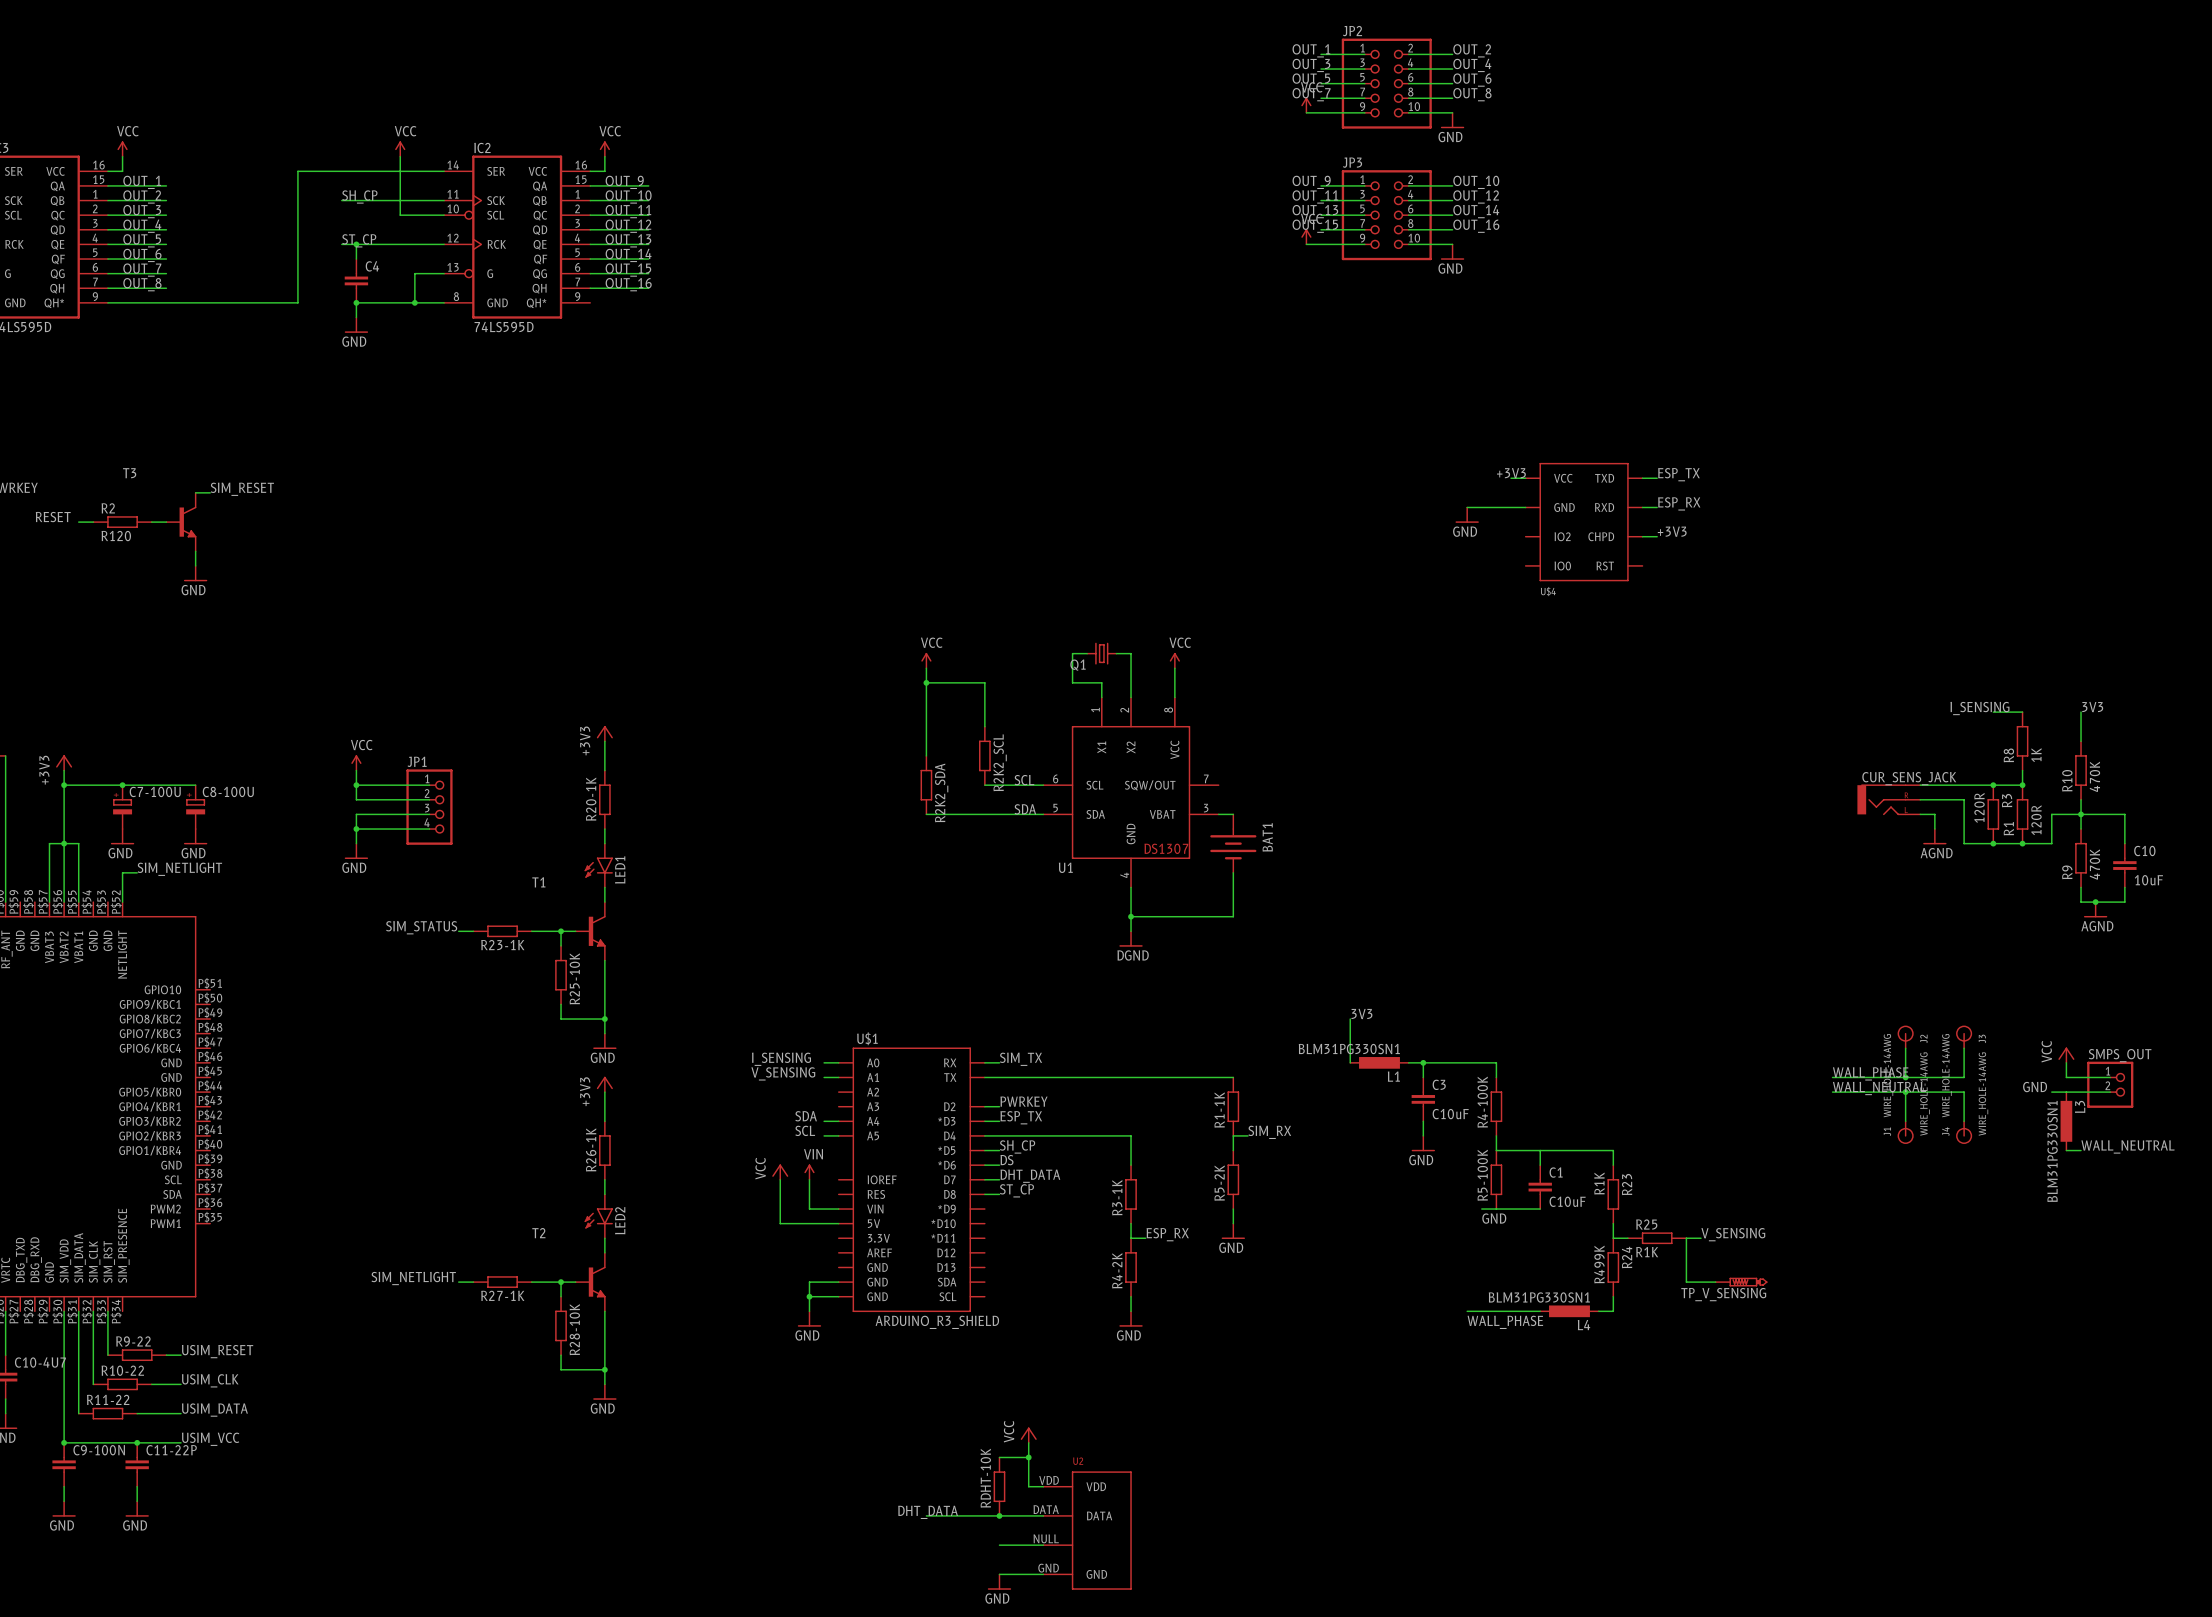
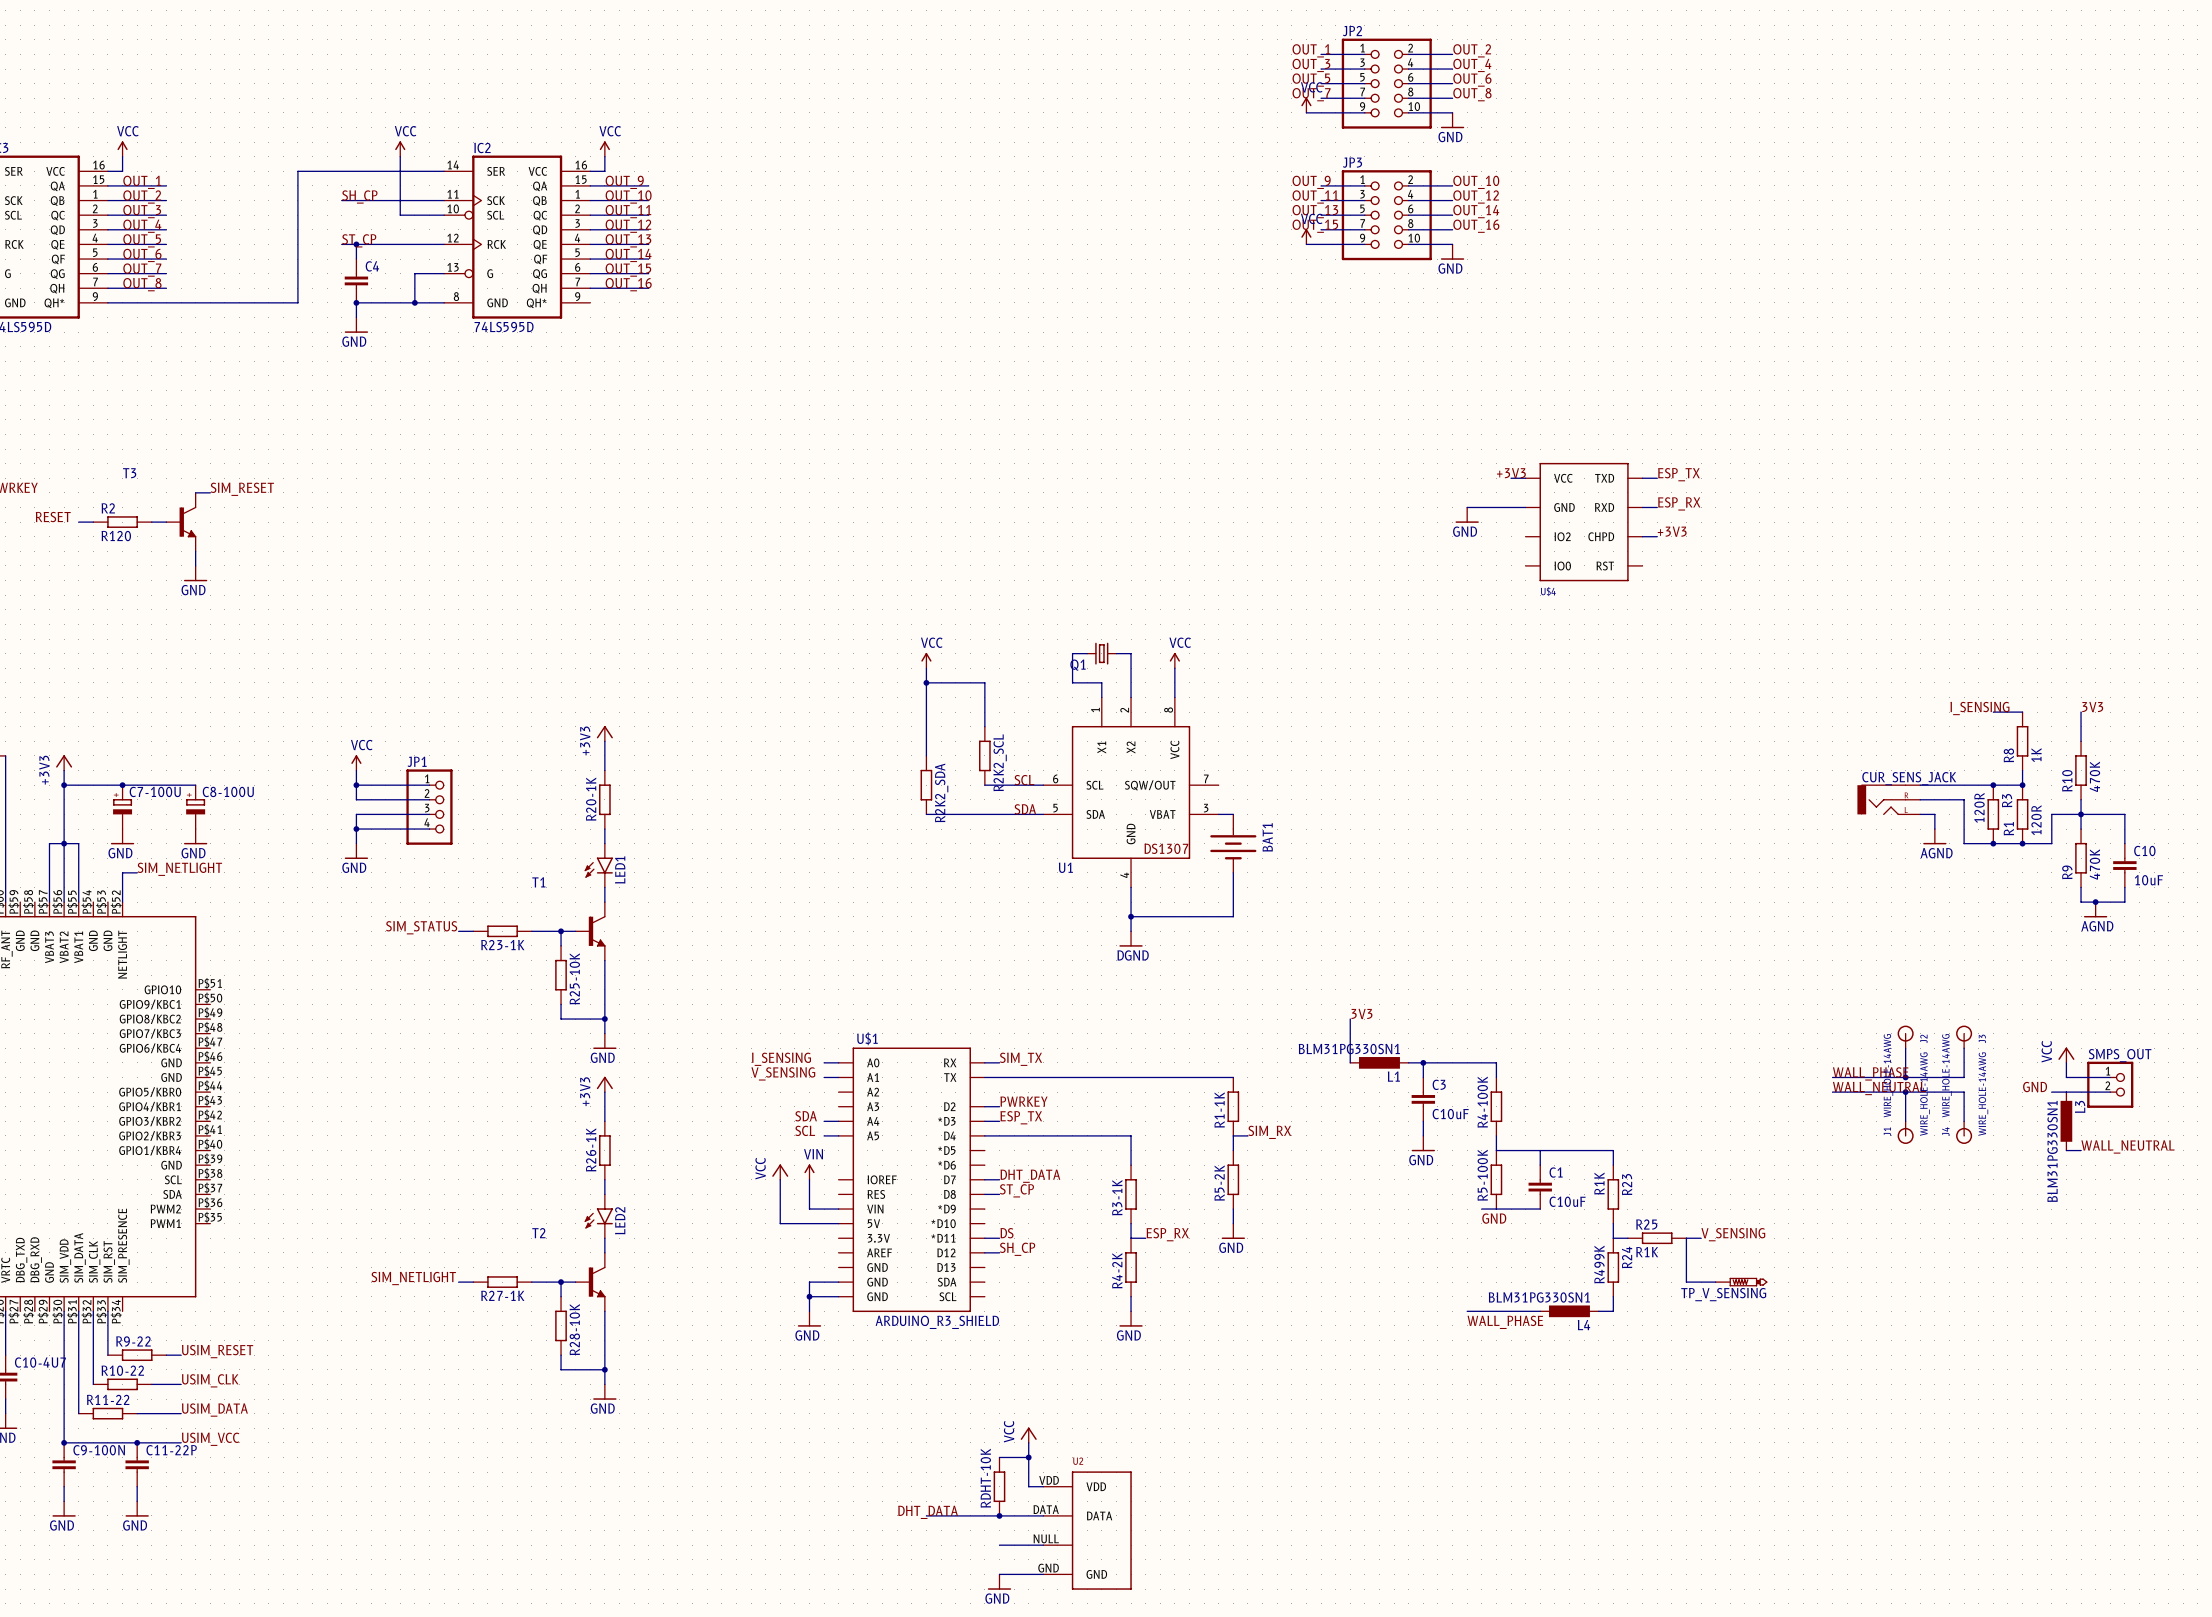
label position: SH_CP (1017, 1146) -> SH_CP (1017, 1249)
wire: (984, 1150) (999, 1150) -> (984, 1252) (999, 1252)
label position: DS (1006, 1160) -> DS (1006, 1233)
wire: (984, 1165) (999, 1165) -> (984, 1238) (999, 1238)

